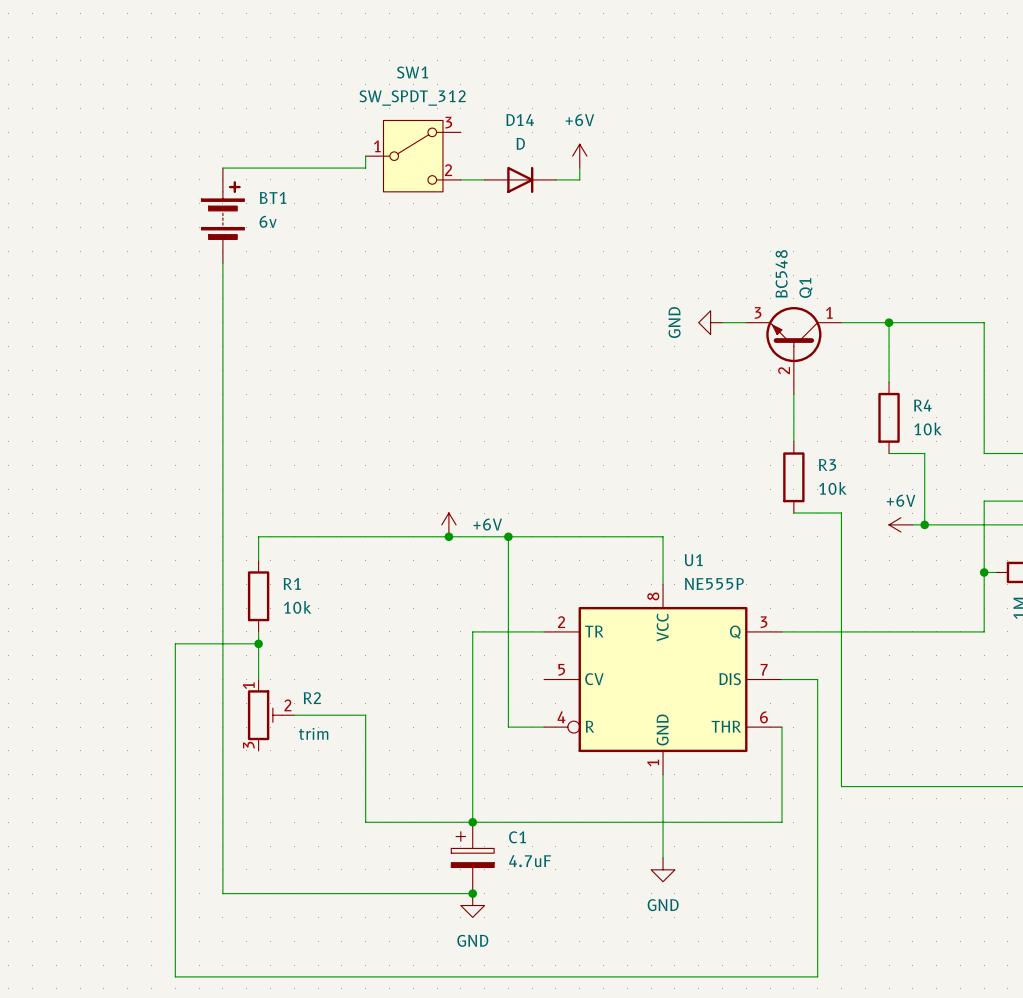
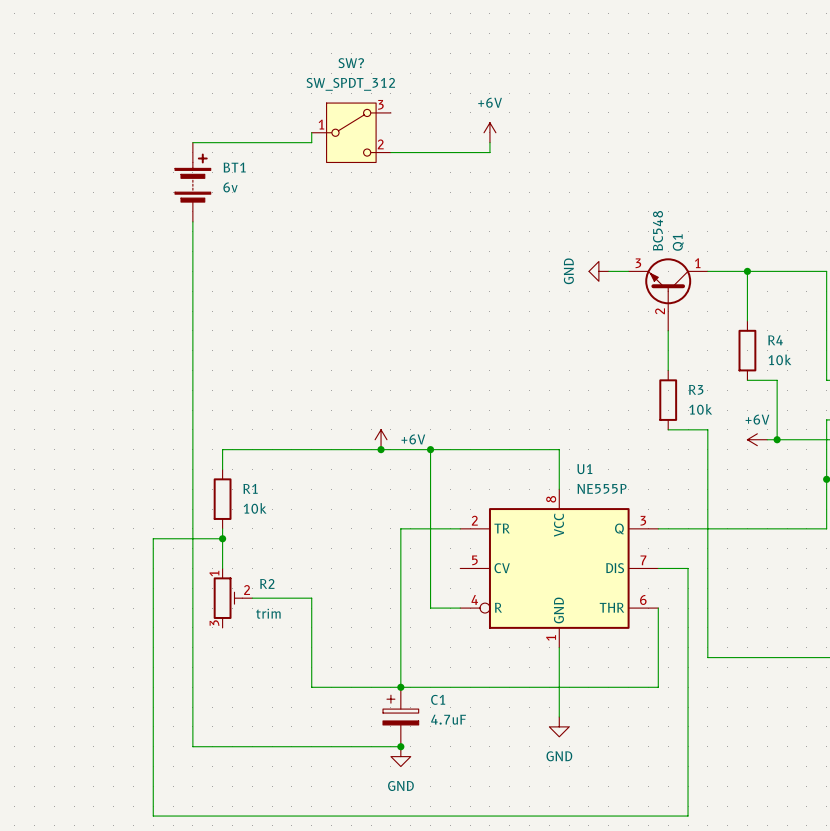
SW1 name: SW1 (412, 72) -> SW? (351, 63)
D14: D (520, 179) -> none

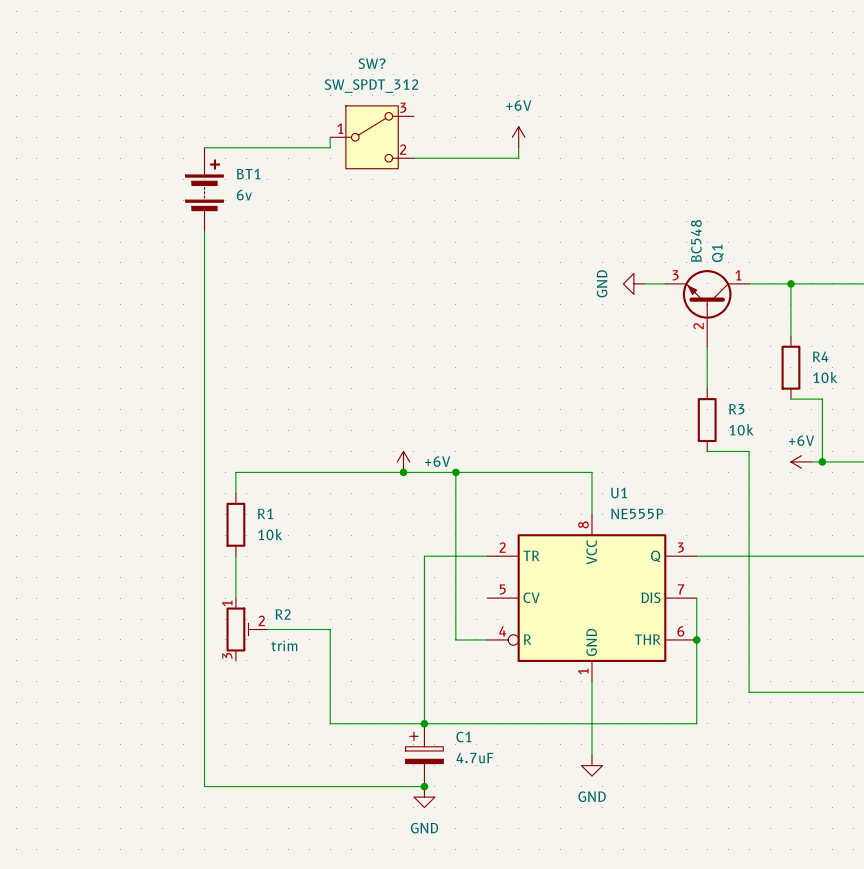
wire: (222, 538) (153, 538) (153, 816) (688, 816) (688, 568) (658, 568) -> (696, 639) (696, 598)
junction: (222, 538) -> none
junction: none -> (696, 639)

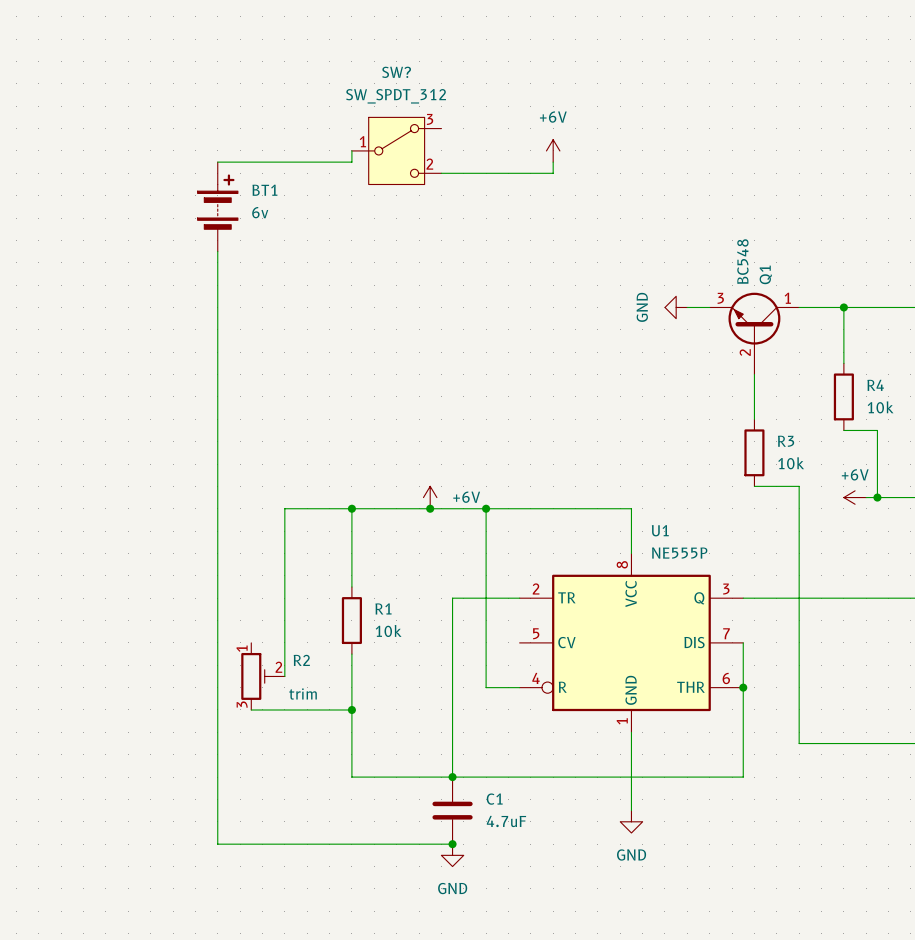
wire: (267, 472) (235, 472) (235, 493) -> (284, 508) (284, 676)
wire: none -> (351, 508) (351, 587)
junction: none -> (351, 508)
R1 position: (235, 524) -> (351, 620)
wire: (235, 556) (235, 598) -> none
wire: (267, 629) (330, 629) -> (351, 654) (351, 676)
wire: none -> (251, 709) (351, 709)
junction: none -> (351, 709)
C1 symbol: [405, 723, 444, 787] -> [432, 777, 473, 845]

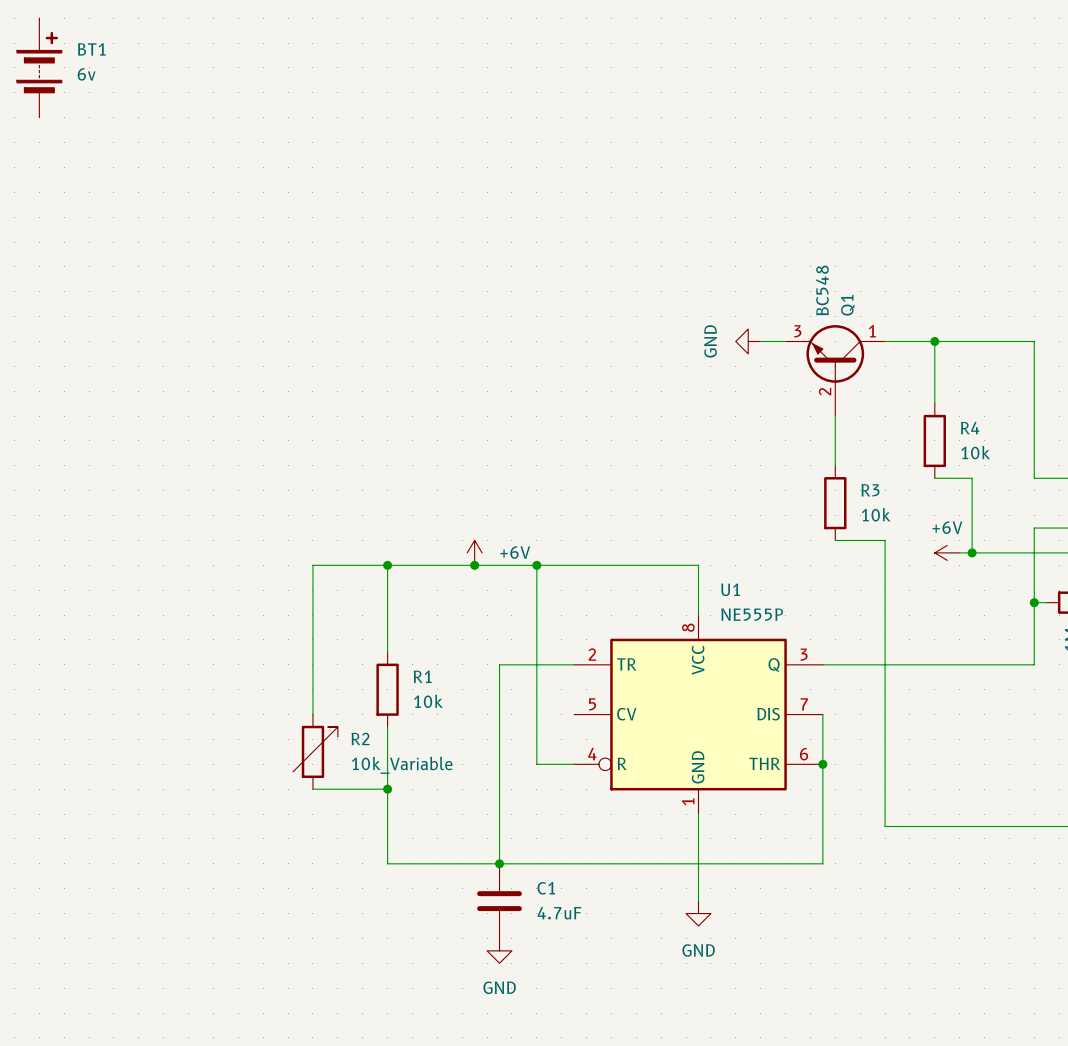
wire: (351, 150) (351, 162) (217, 162) -> none
SW?: SW_SPDT_312 (396, 150) -> none
power symbol: +6V (553, 150) -> none
wire: (553, 162) (553, 173) (441, 173) -> none
BT1 position: (217, 206) -> (39, 67)
wire: (217, 251) (217, 844) (452, 844) -> none
R2 symbol: [241, 642, 285, 710] -> [293, 714, 338, 790]
wire: (284, 642) (284, 676) -> none
R2 value: trim (303, 694) -> 10k_Variable (402, 765)
wire: (251, 709) (284, 709) -> none
junction: (452, 844) -> none

